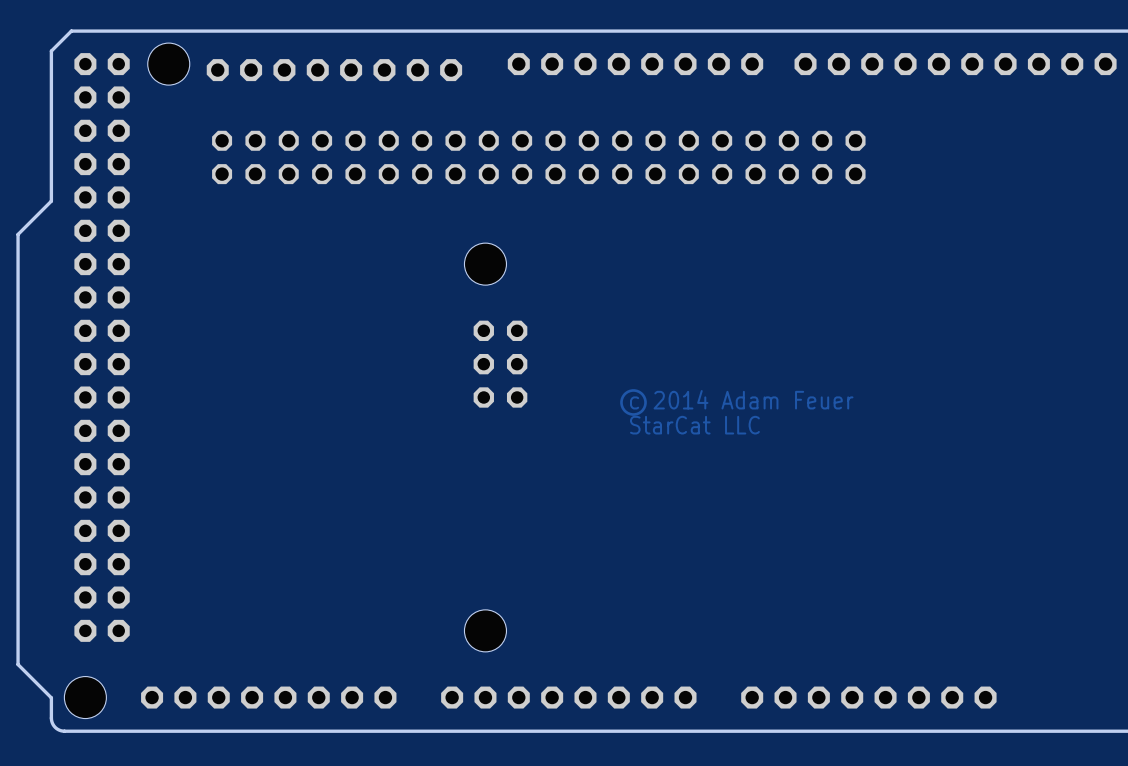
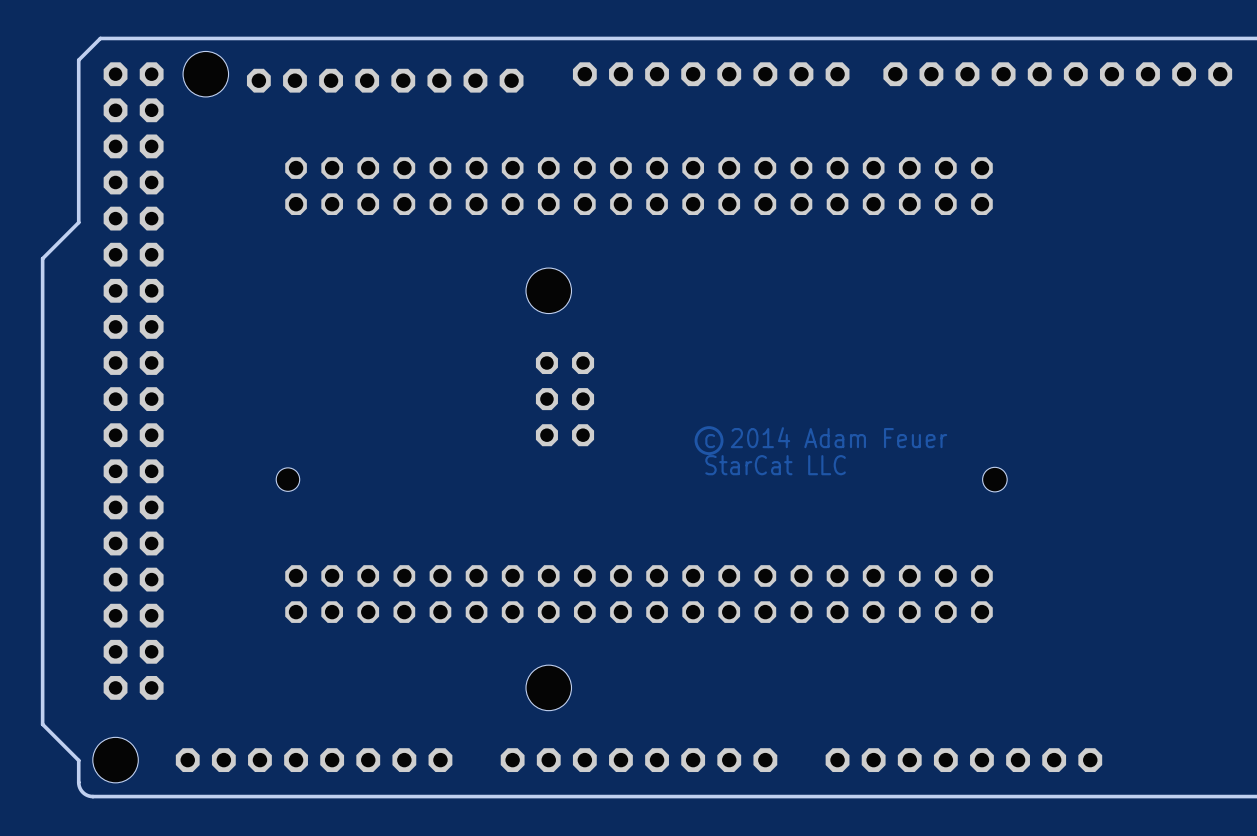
part position: (538, 157) -> (639, 186)
hole: none -> (287, 479)
hole: none -> (994, 479)
part: none -> (639, 594)

